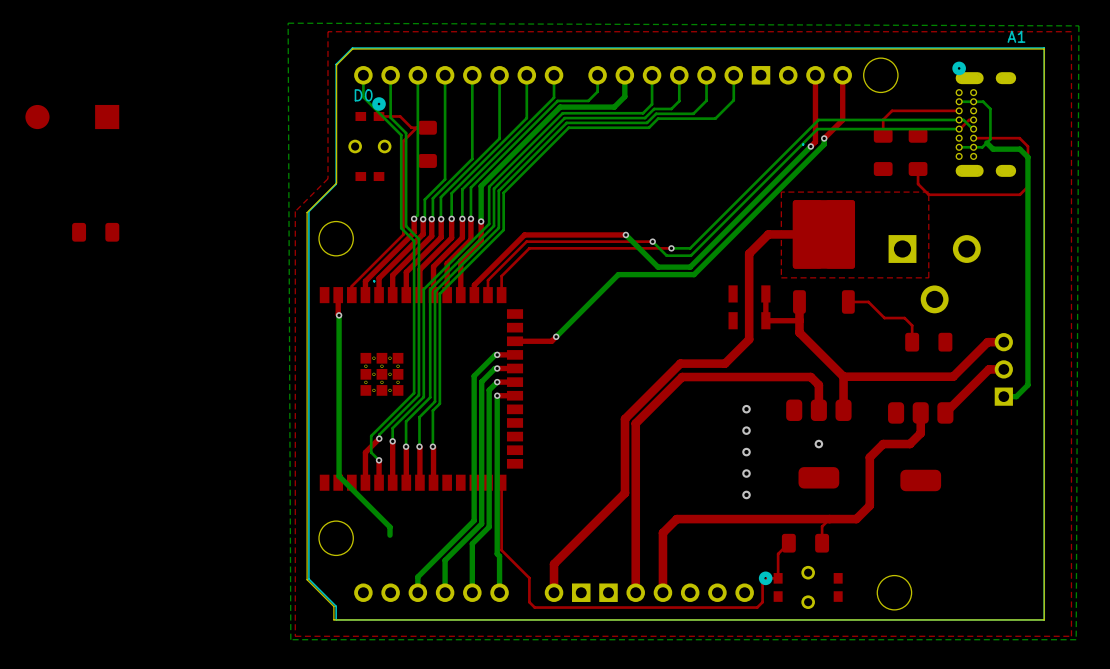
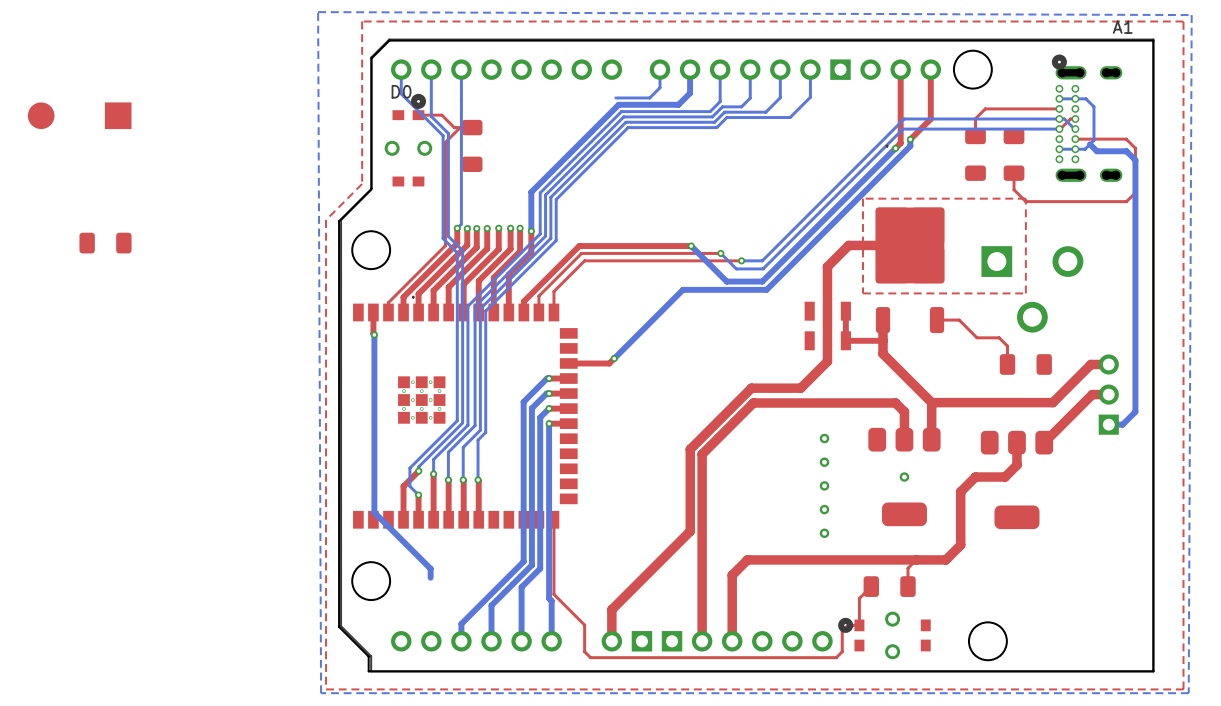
bottom track: (445, 75) (445, 179) (424, 199) (424, 217) -> none
bottom track: (472, 75) (472, 158) (432, 198) (432, 218) -> none
bottom track: (499, 75) (499, 138) (440, 197) (440, 218) -> none
bottom track: (526, 75) (526, 118) (451, 193) (451, 218) -> none
bottom track: (554, 75) (554, 97) (462, 189) (462, 218) -> none
bottom track: (557, 100) (470, 187) (470, 218) -> none

